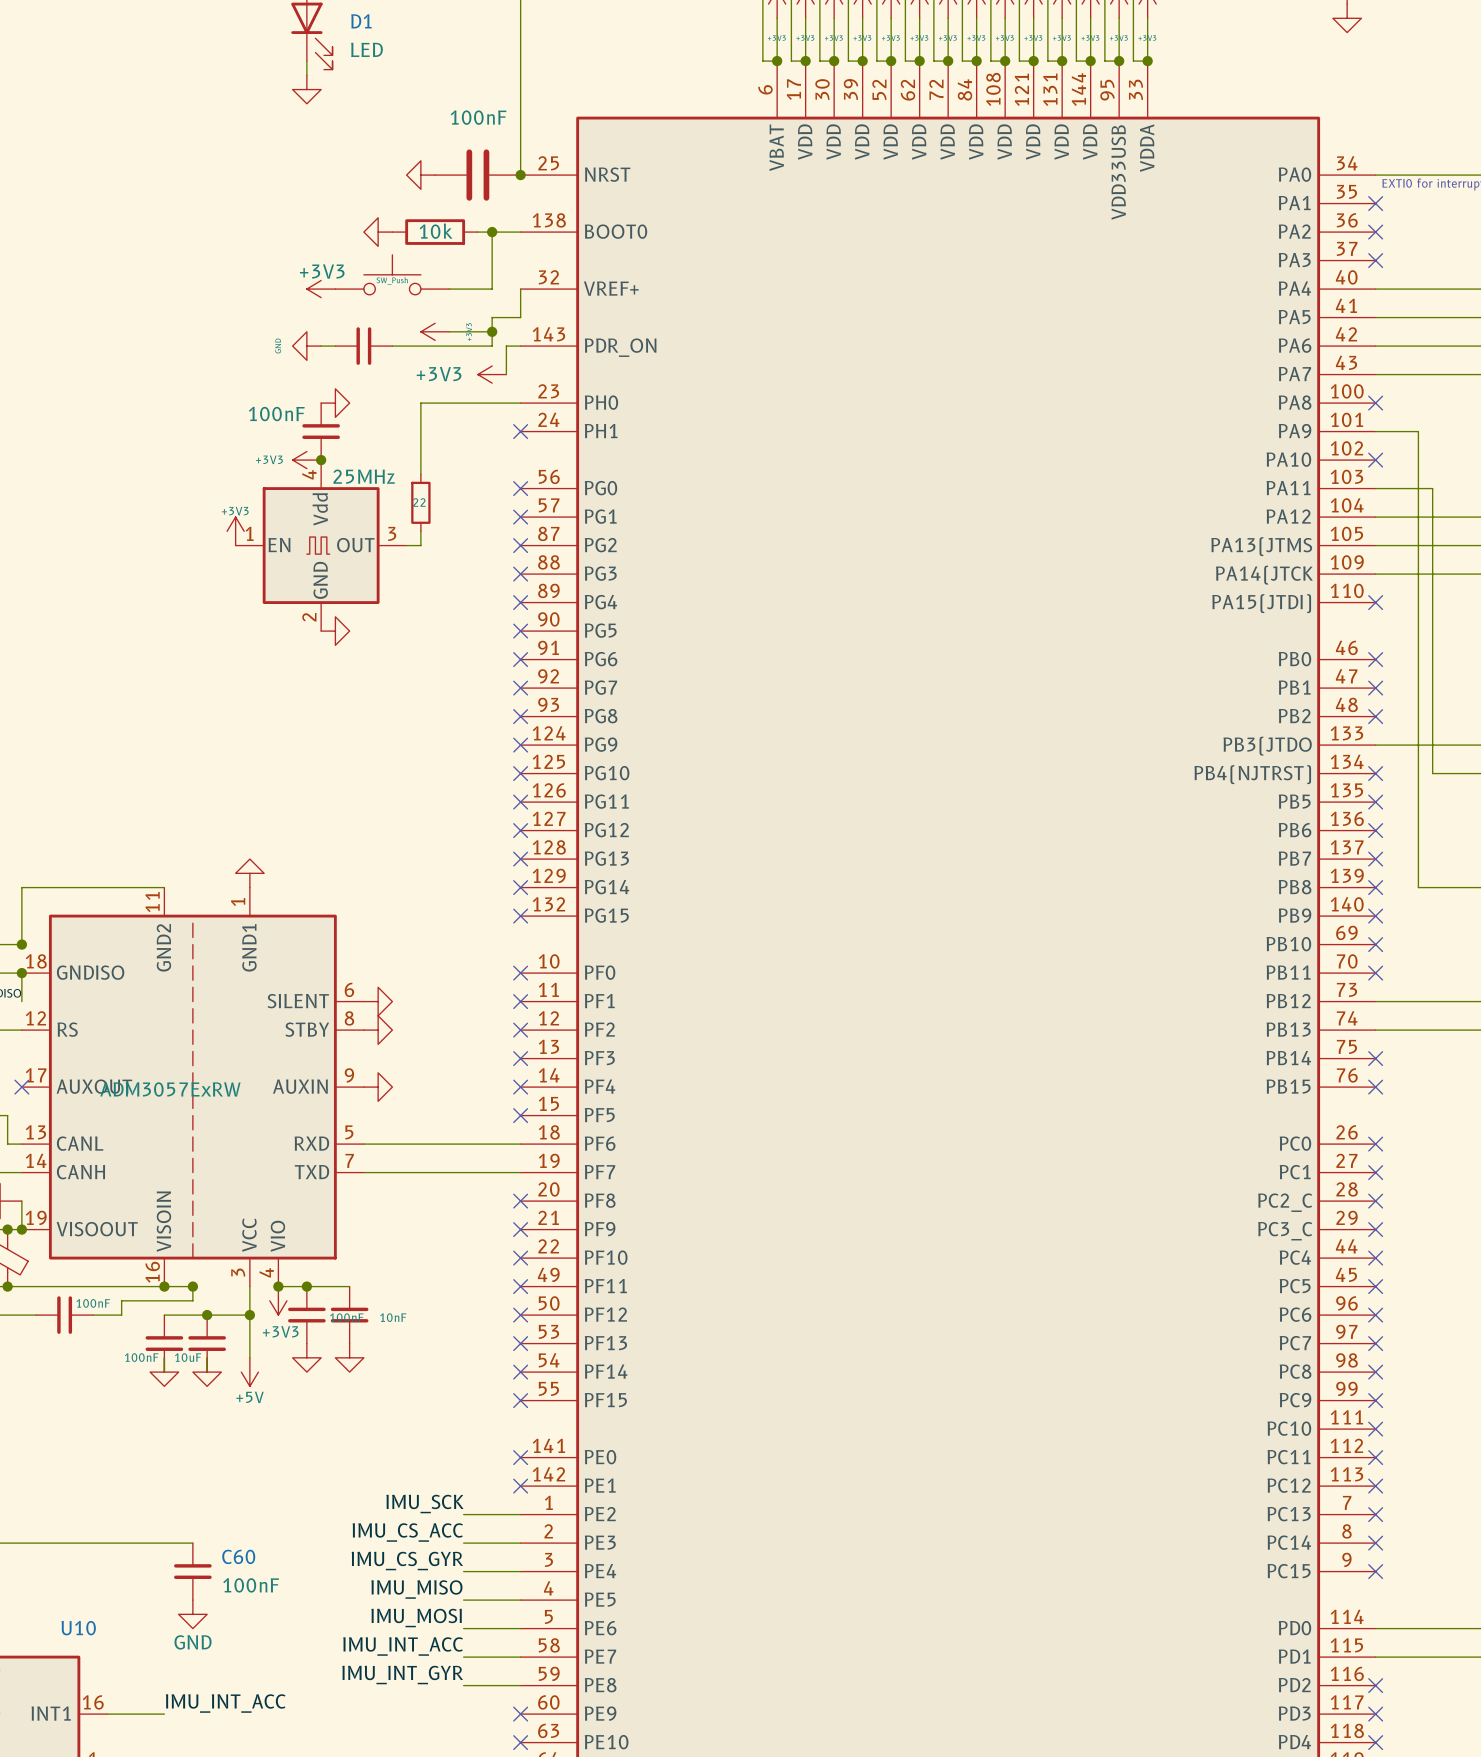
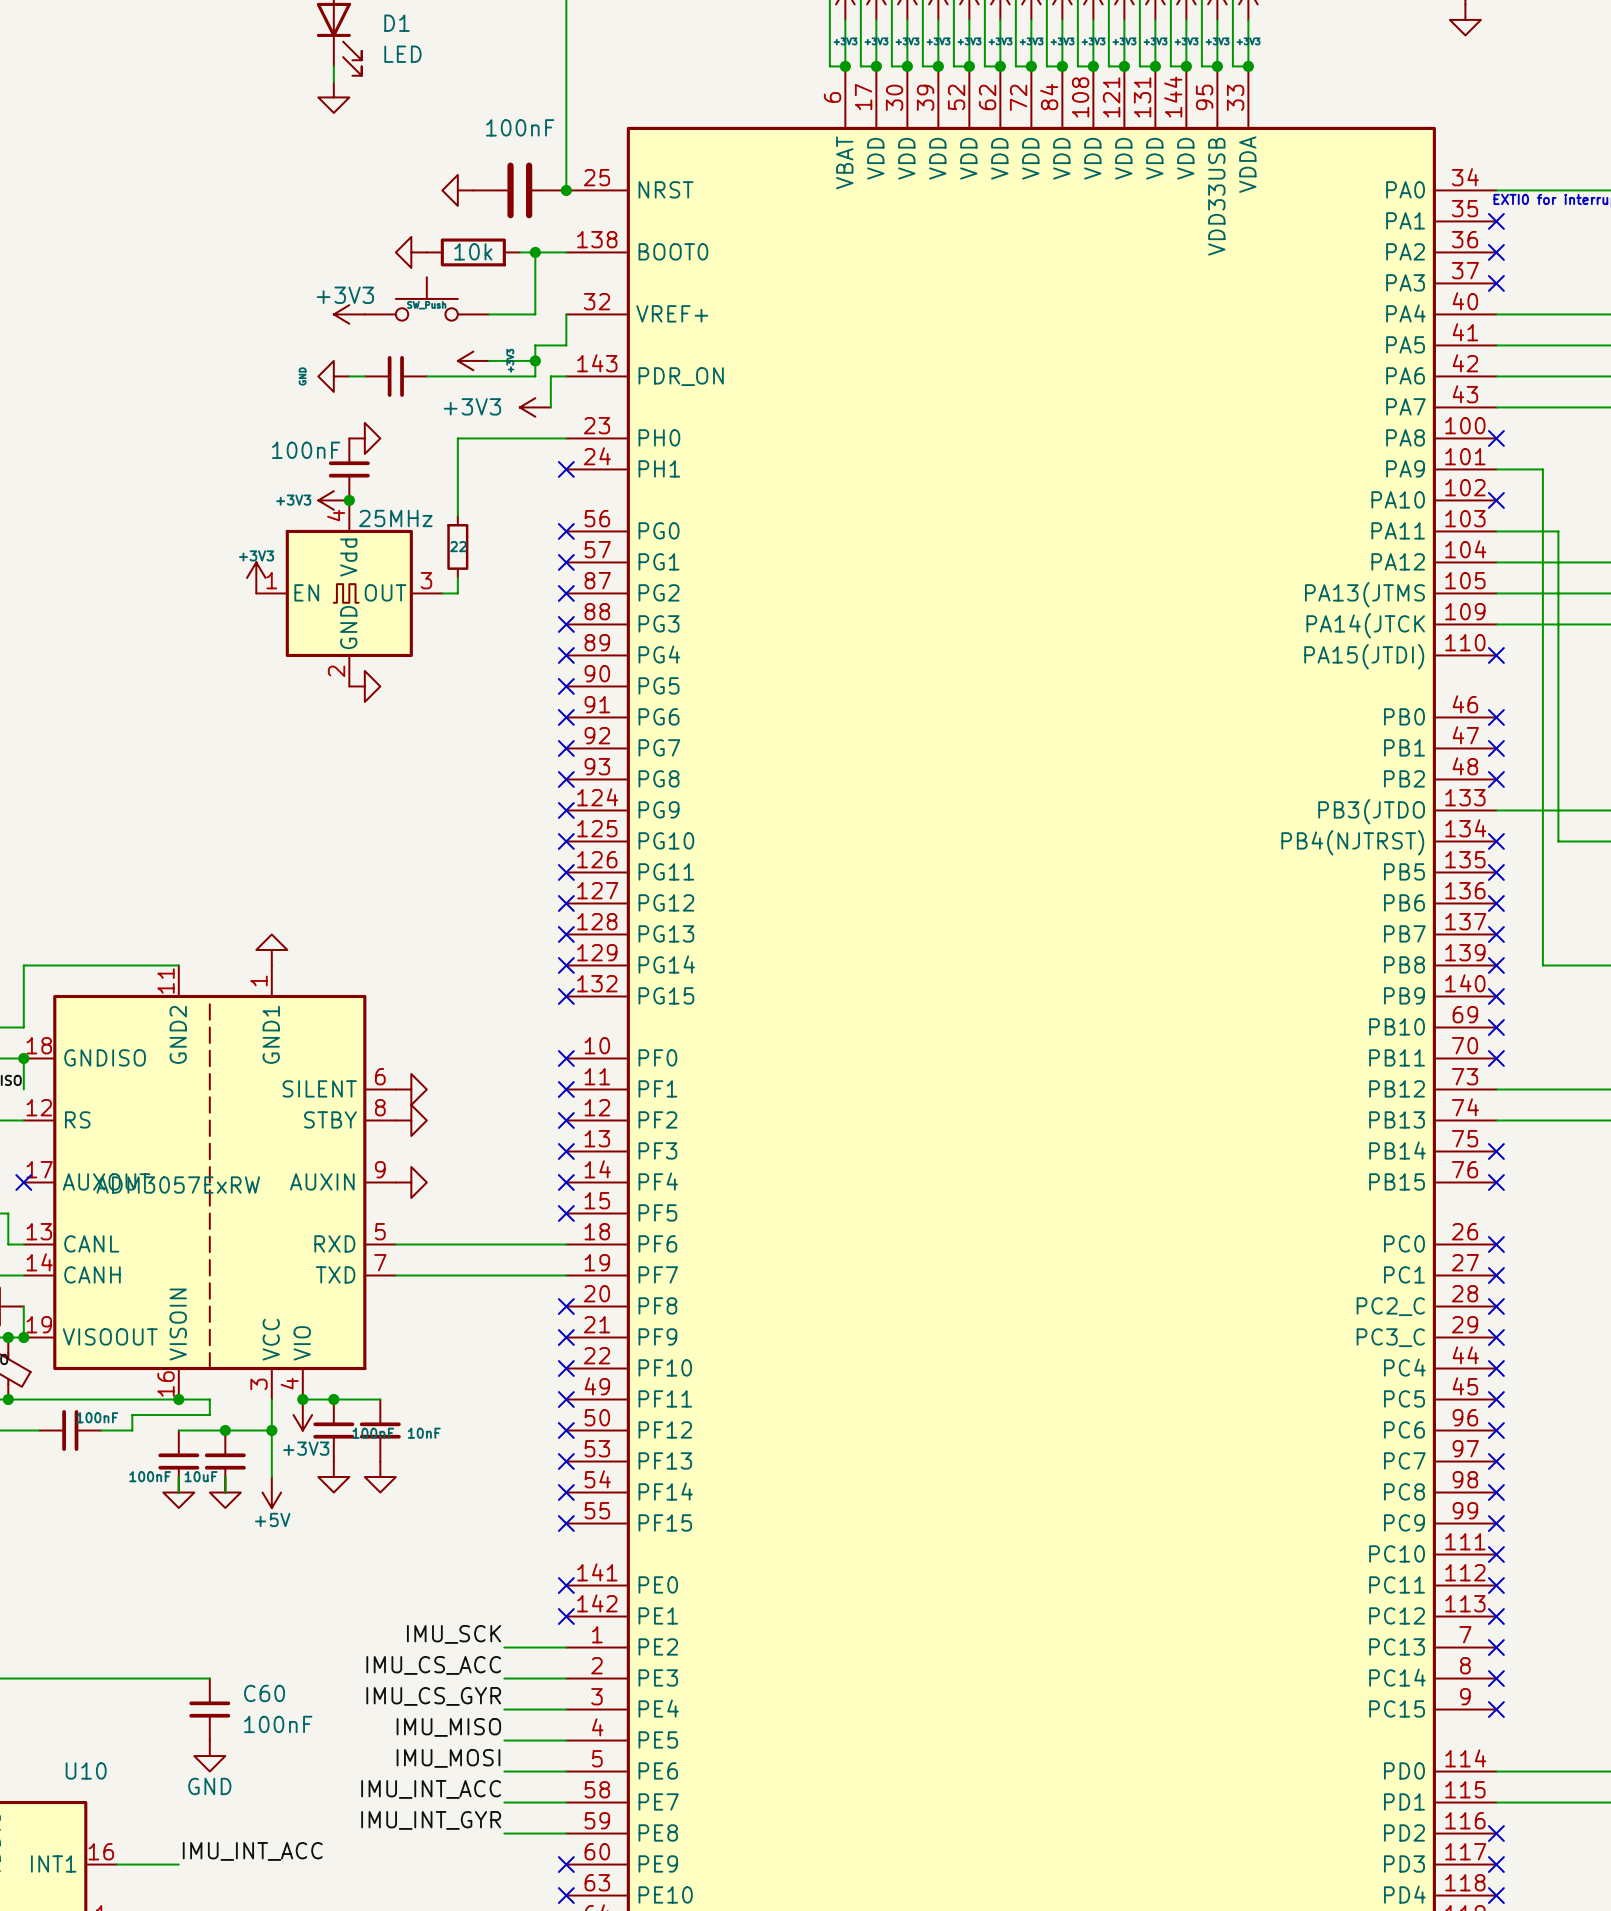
junction: (21, 944) -> none
junction: (192, 1286) -> none

